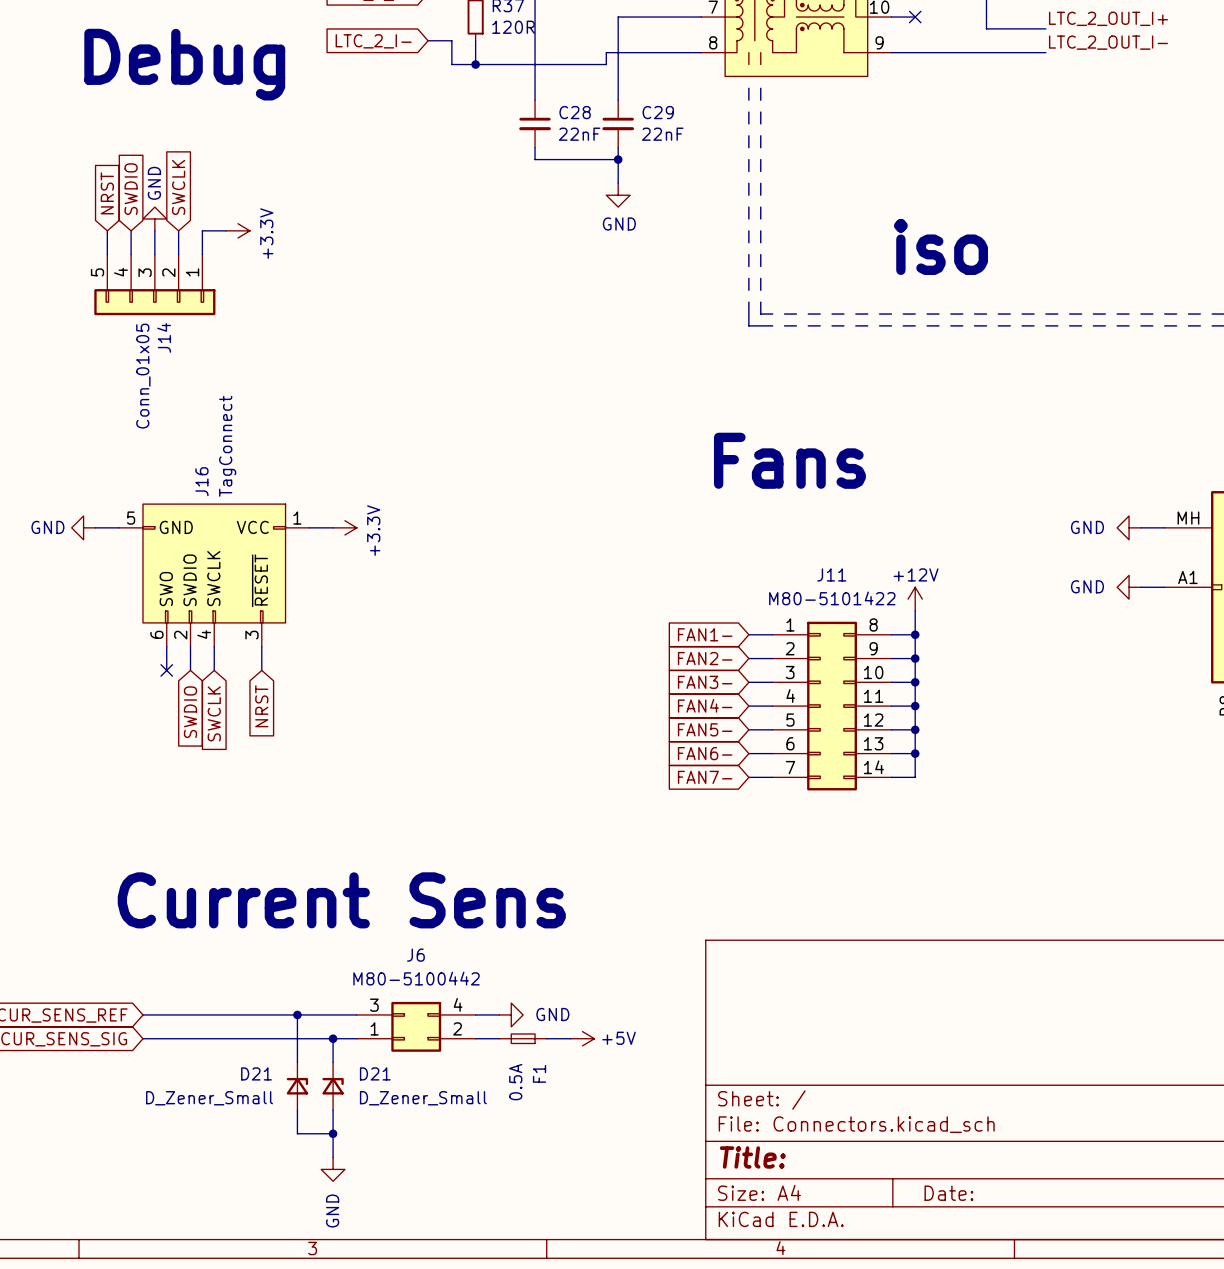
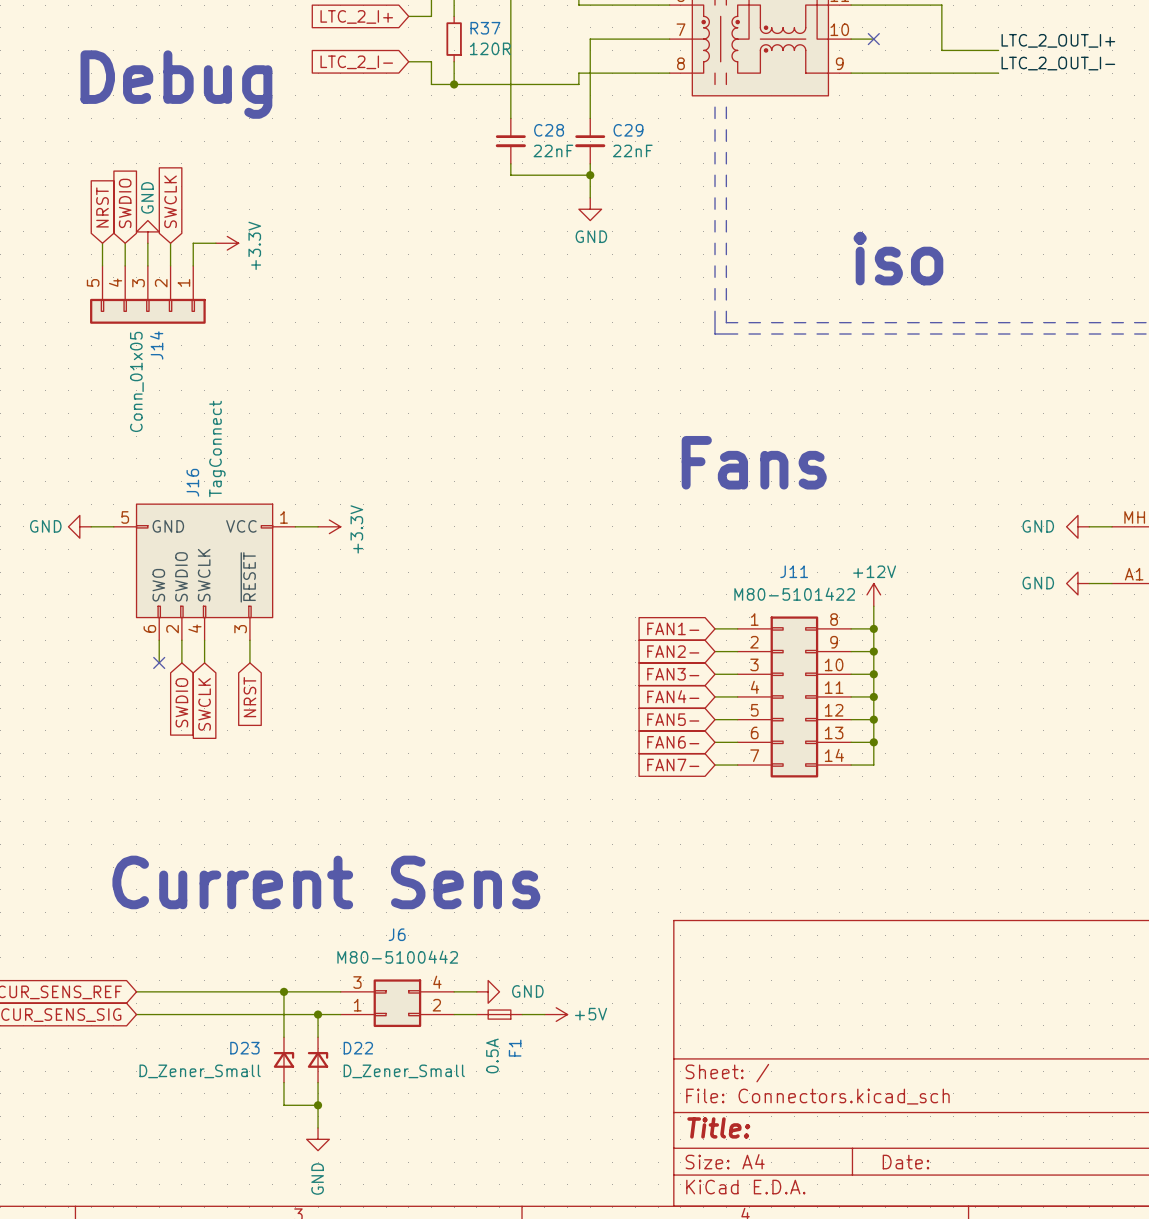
D21 name: D21 (256, 1073) -> D23 (244, 1048)
D21 name: D21 (375, 1073) -> D22 (358, 1048)

